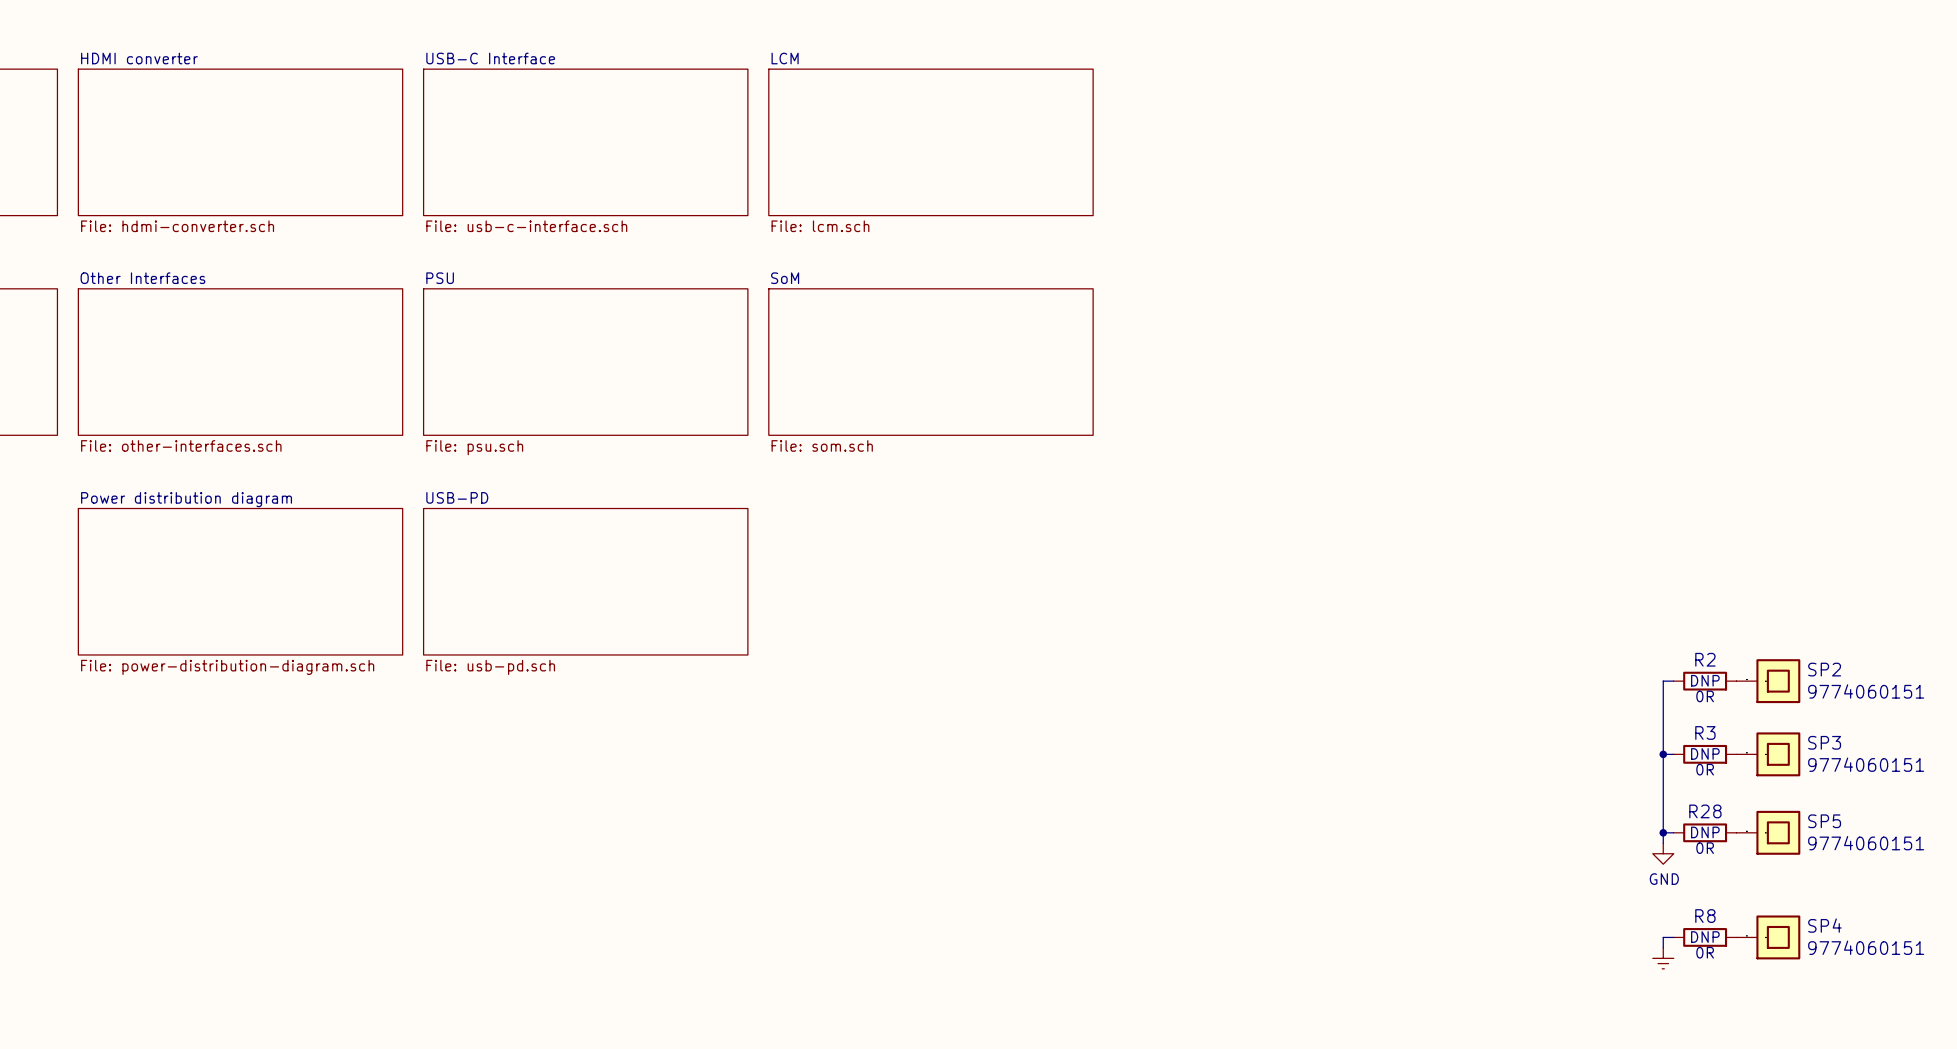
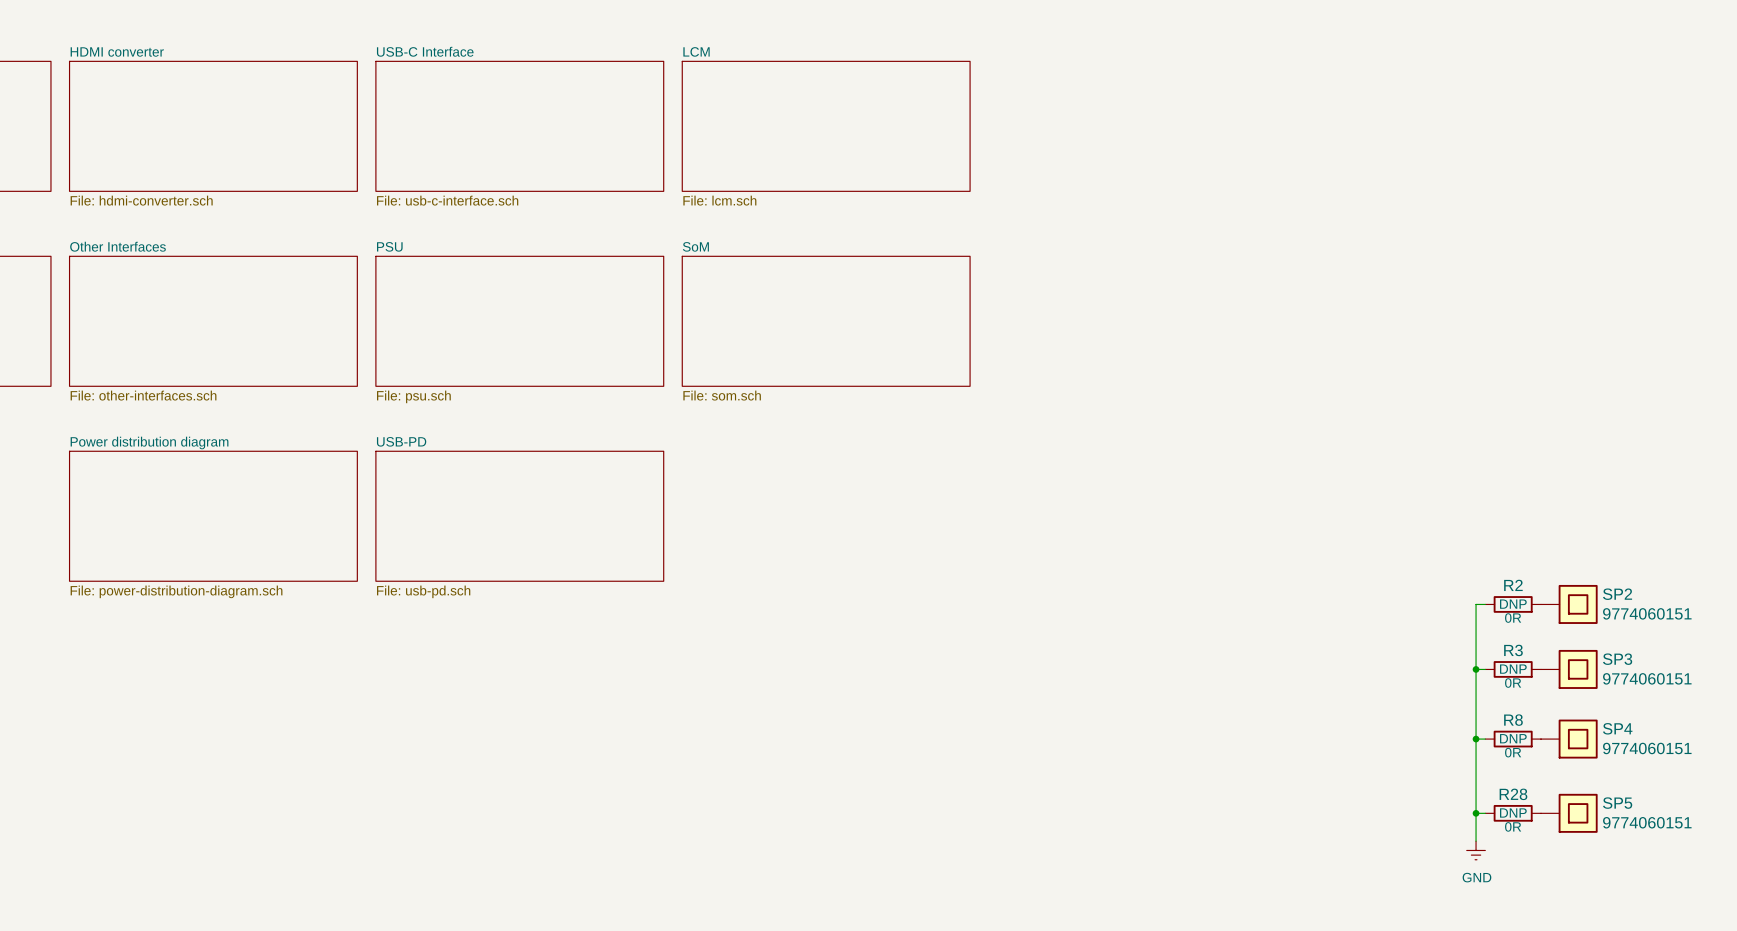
R28 name: R28 (1705, 811) -> R8 (1513, 720)
SP5 name: SP5 (1824, 821) -> SP4 (1617, 728)
power symbol: GND (1663, 853) -> none
wire: none -> (1476, 813) (1485, 813)
junction: none -> (1476, 813)
R28: none -> (1513, 813)
SP5: none -> 9774060151 (1569, 813)
wire: (1663, 937) (1673, 937) -> (1476, 831) (1476, 748)
R8: (1705, 937) -> none
SP4: 9774060151 (1768, 937) -> none
power symbol text: none -> GND (1476, 877)

